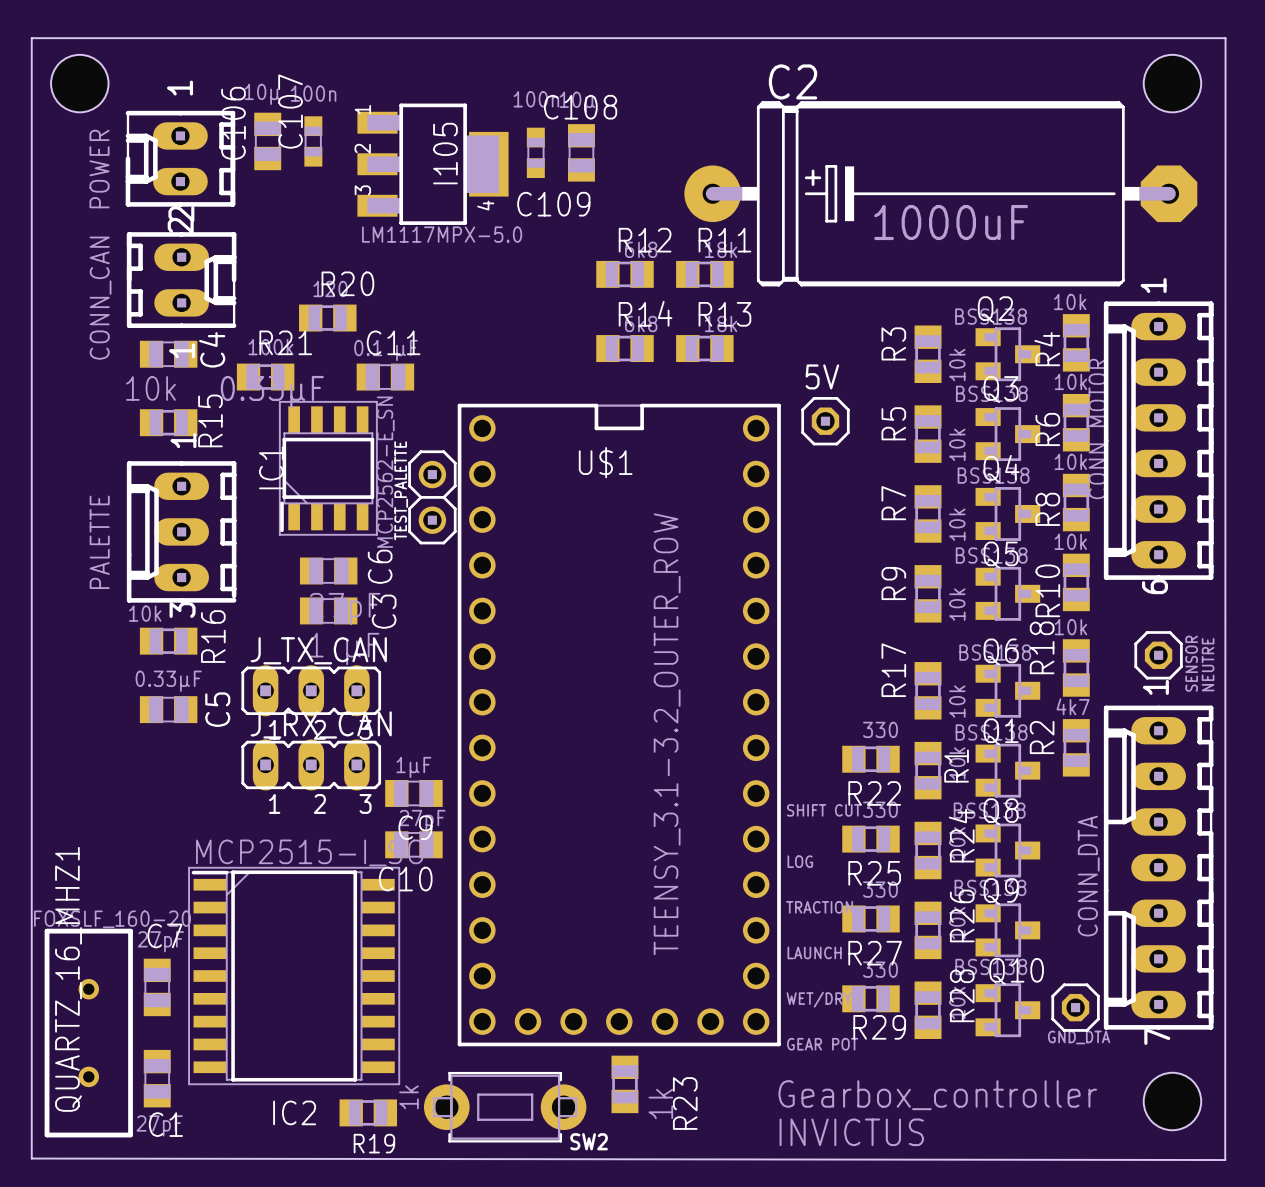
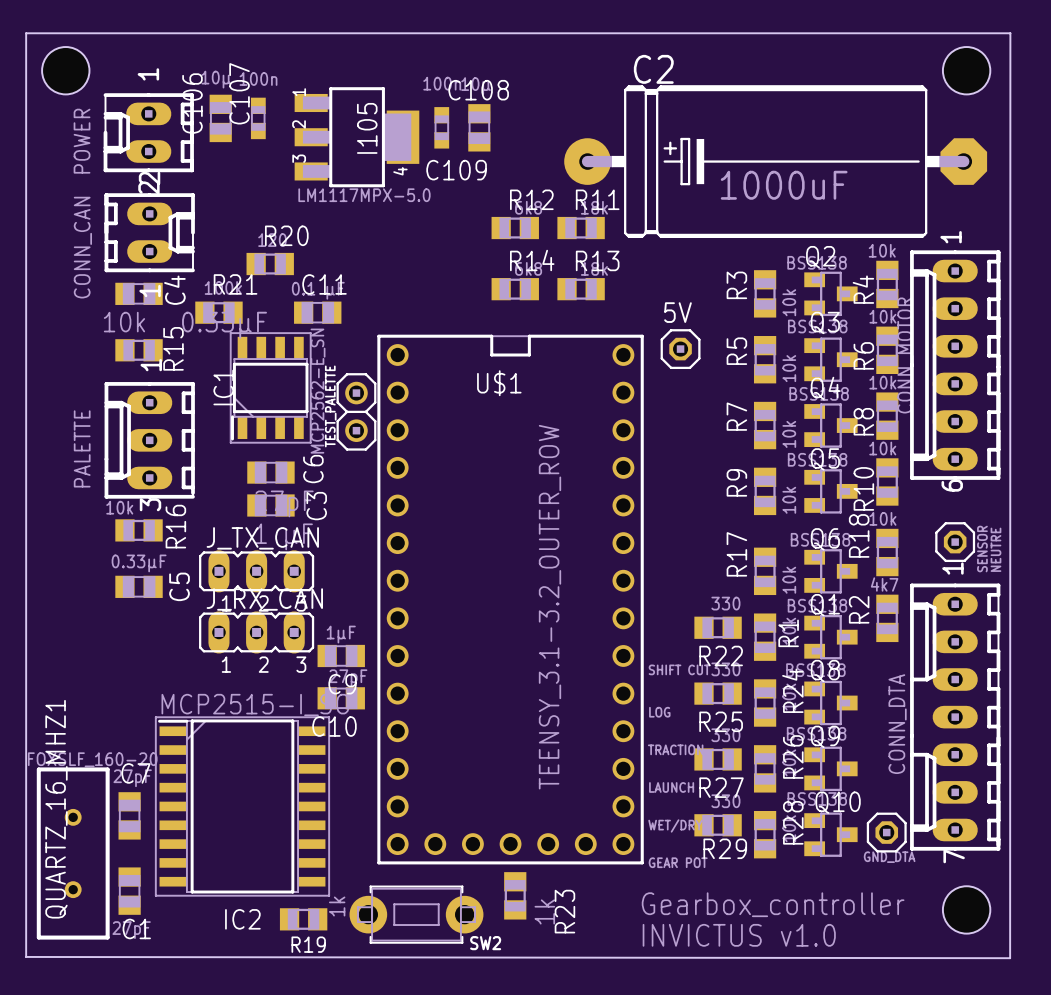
text: INVICTUS (851, 1132) -> INVICTUS v1.0 (739, 935)

